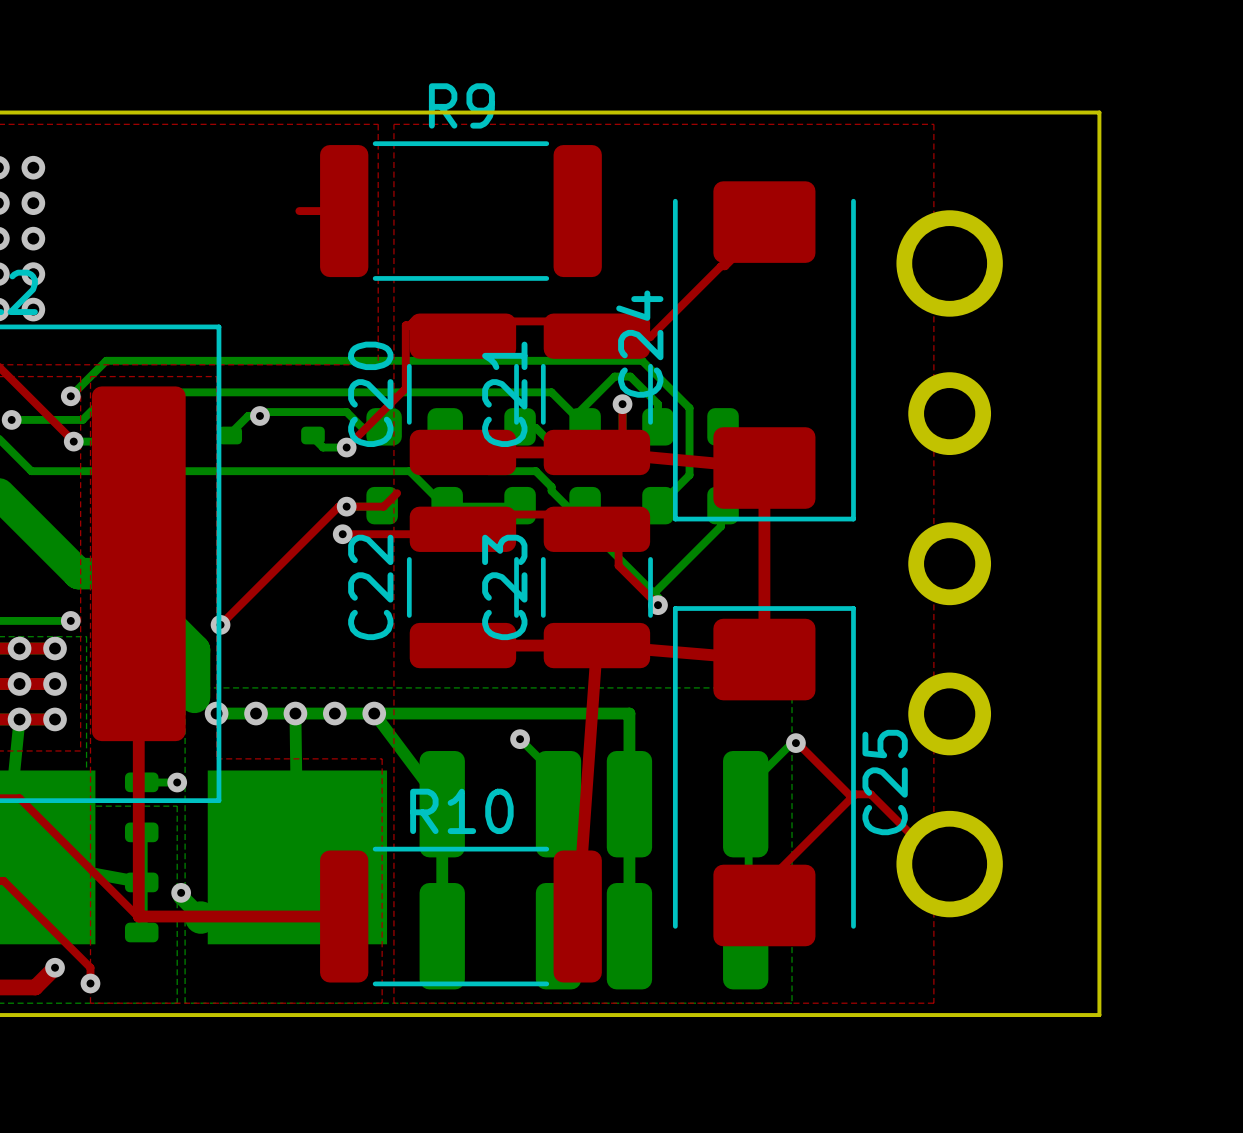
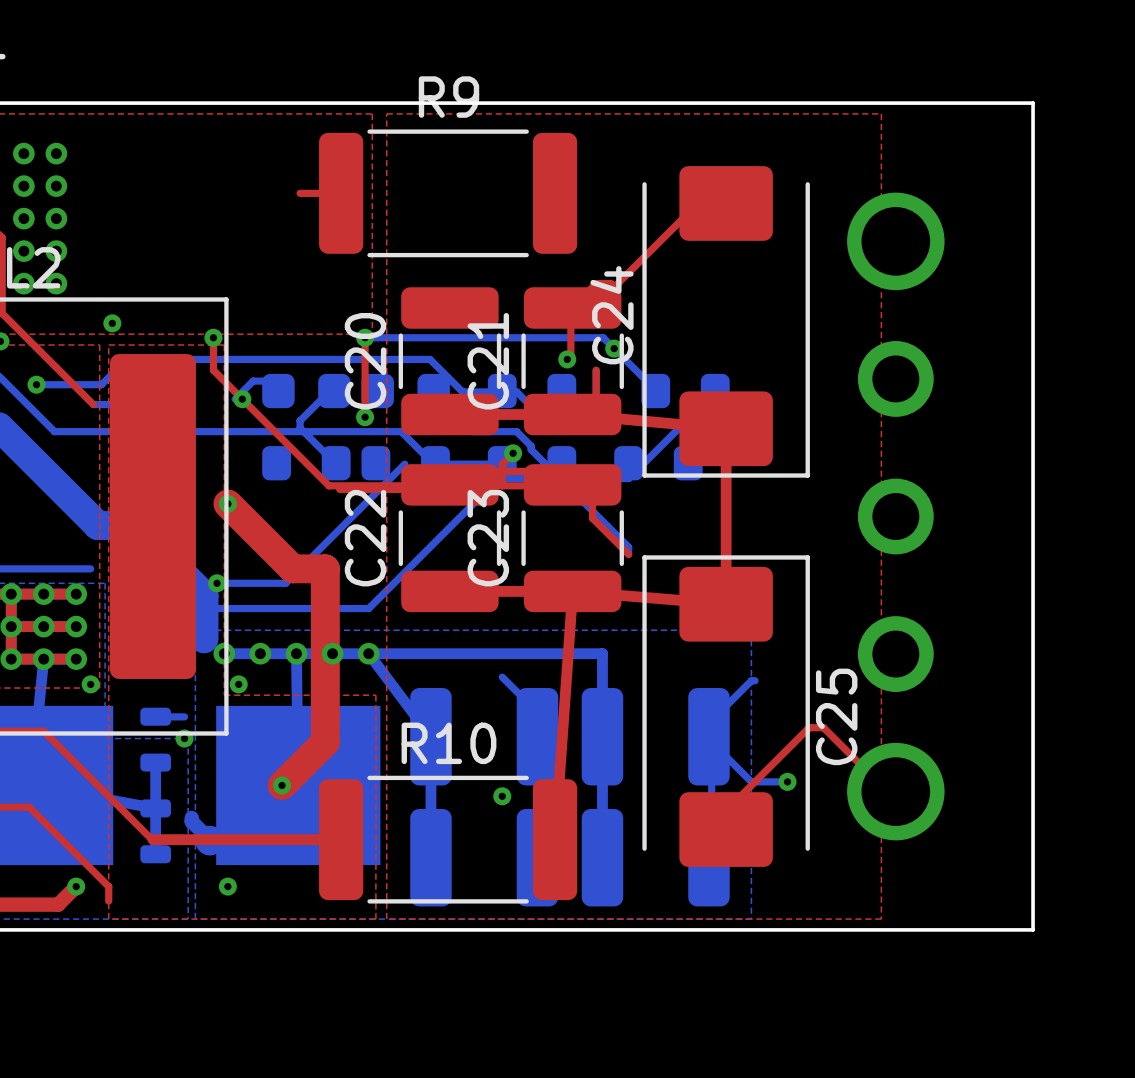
top track: (764, 222) (764, 226) (725, 266) (721, 266) (650, 337) (594, 337) (579, 321) (476, 321) (460, 337) (445, 321) (413, 321) (409, 325) (405, 325) (405, 388) (346, 447) -> (726, 204) (697, 204) (614, 287) (610, 283) (596, 283) (570, 308) (570, 355) (567, 359)
via: none -> (112, 323)
top track: none -> (213, 337) (213, 370) (328, 485) (570, 485)
via: none -> (213, 337)
top track: none -> (365, 337) (365, 417)
bottom track: none -> (365, 337) (603, 337) (657, 391) (655, 391)
via: none -> (365, 337)
via: none -> (614, 348)
bottom track: (441, 392) (551, 392) (587, 427) -> (430, 359) (462, 391) (502, 391)
via: none -> (567, 359)
bottom track: (70, 396) (106, 360) (642, 360) (689, 408) (689, 475) (658, 506) -> none
via: (70, 396) -> none
via: (622, 404) -> none
bottom track: (267, 412) (346, 412) (362, 427) (382, 427) -> none
via position: (259, 415) -> (242, 399)
bottom track: (575, 415) (614, 376) (630, 376) (658, 404) (658, 427) -> none
part footprint: [218, 426, 325, 445] -> [262, 373, 351, 409]
bottom track: none -> (334, 391) (328, 391) (300, 420) (300, 428) (336, 463)
part position: (690, 426) -> (685, 391)
bottom track: none -> (715, 391) (628, 478) (498, 478) (368, 608) (209, 608) (191, 590) (191, 482)
bottom track: (312, 435) (311, 435) (323, 447) (346, 447) -> none
via: (73, 441) -> none
via position: (346, 447) -> (365, 417)
top track: (397, 493) (383, 506) (338, 506) (220, 624) -> none
top track: none -> (513, 453) (502, 464) (502, 485)
via: none -> (513, 453)
part: none -> (306, 463)
via: (346, 506) -> none
bottom track: none -> (404, 464) (285, 583) (217, 583)
bottom track: (721, 506) (721, 526) (654, 593) -> none
via: (342, 534) -> none
top track: none -> (227, 503) (292, 568) (325, 568) (325, 742) (282, 785)
via: none -> (227, 503)
top track: (138, 563) (138, 916) -> none
via: (658, 605) -> none
via: (70, 620) -> none
via position: (220, 624) -> (217, 583)
via: (520, 739) -> none
top track: (795, 743) (851, 797) -> none
via position: (795, 743) -> (787, 781)
via: none -> (90, 684)
via: none -> (238, 684)
via position: (177, 782) -> (184, 738)
bottom track: none -> (708, 738) (751, 781) (787, 781)
via: none -> (282, 785)
via: none -> (502, 796)
via: (181, 892) -> none
via: none -> (227, 886)
via: (90, 983) -> none

